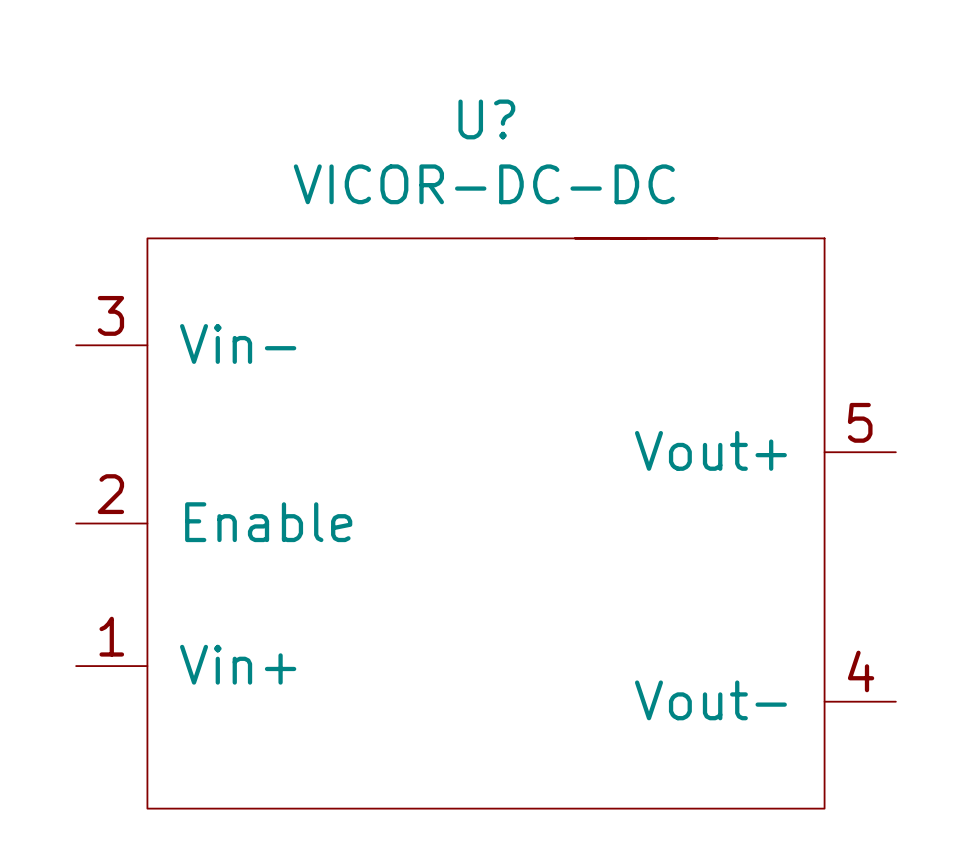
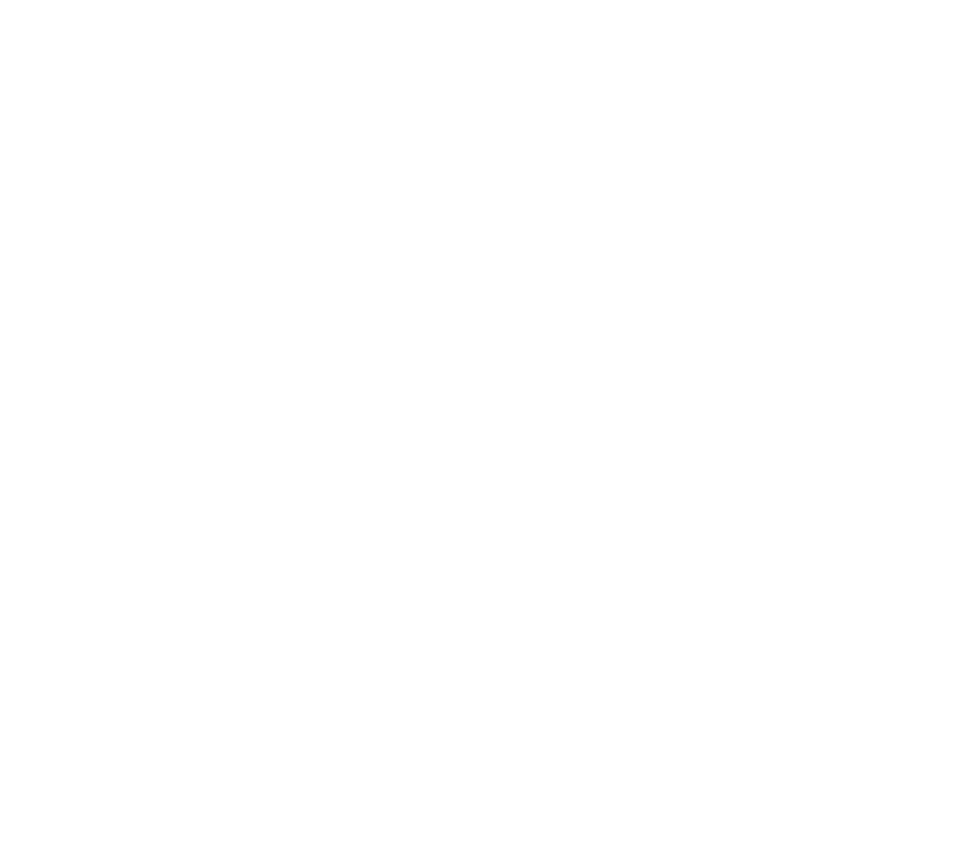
U?: VICOR-DC-DC (485, 523) -> none

